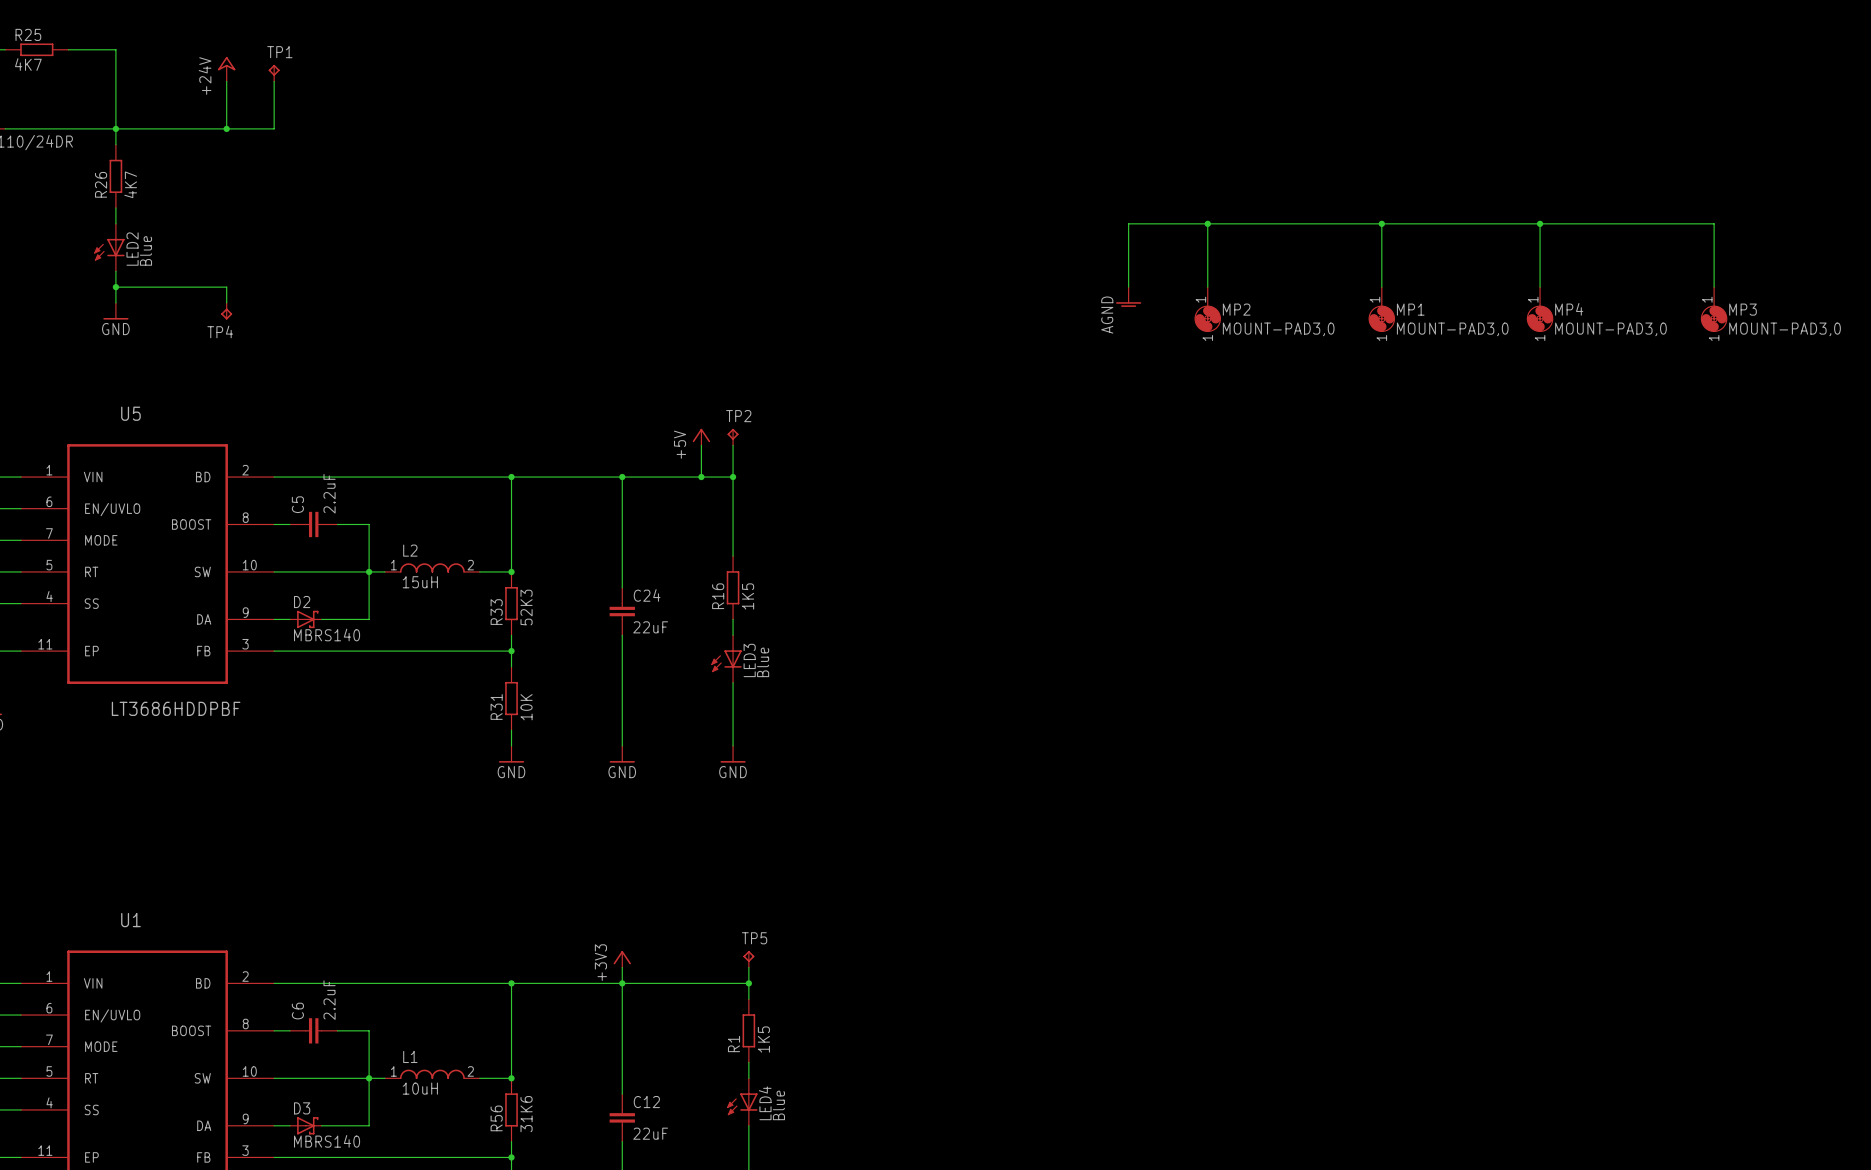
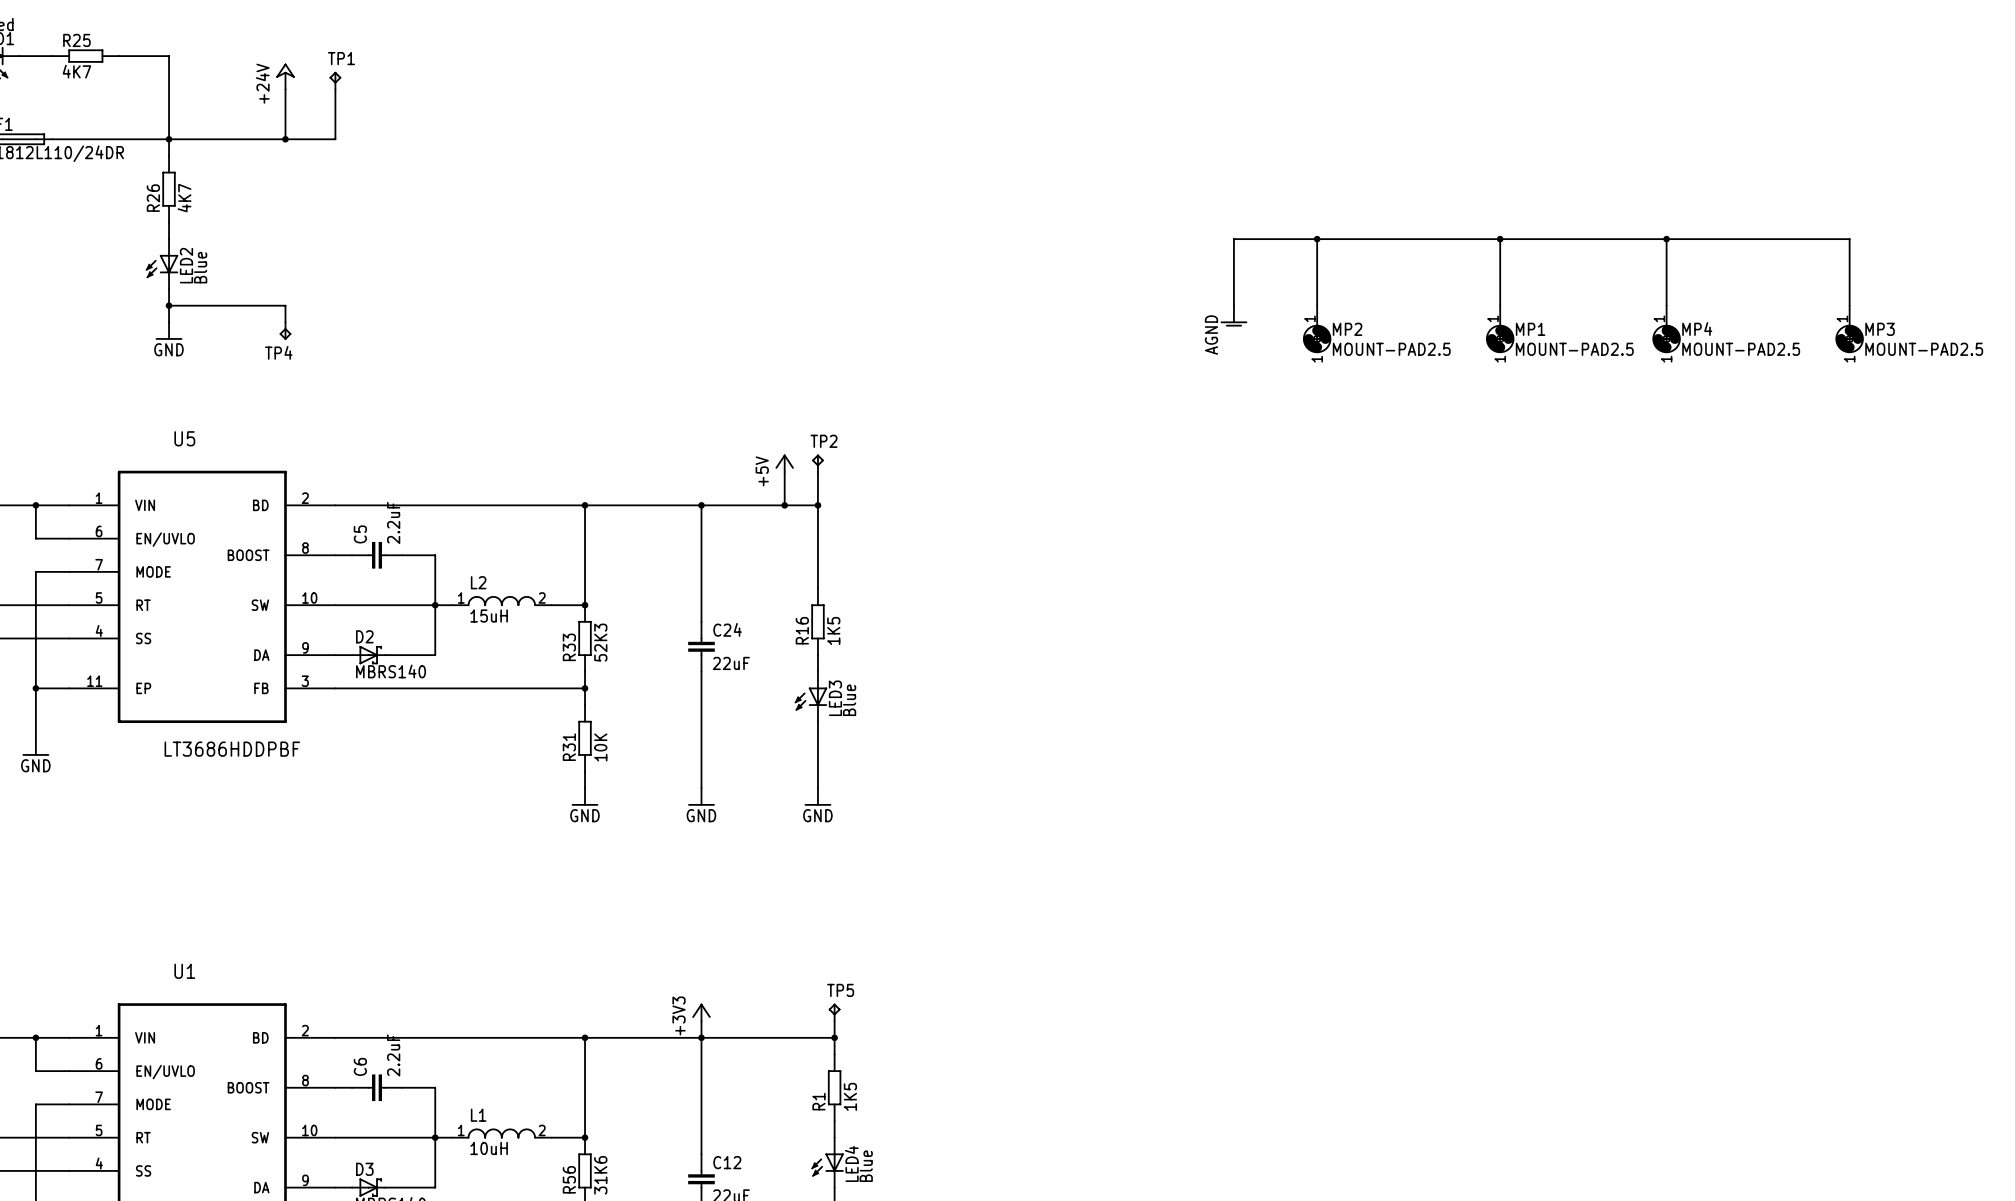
MP2 value: MOUNT-PAD3,0 (1278, 329) -> MOUNT-PAD2.5 (1391, 349)
MP1 value: MOUNT-PAD3,0 (1452, 329) -> MOUNT-PAD2.5 (1574, 349)
MP4 value: MOUNT-PAD3,0 (1610, 329) -> MOUNT-PAD2.5 (1741, 349)
MP3 value: MOUNT-PAD3,0 (1785, 329) -> MOUNT-PAD2.5 (1924, 349)

